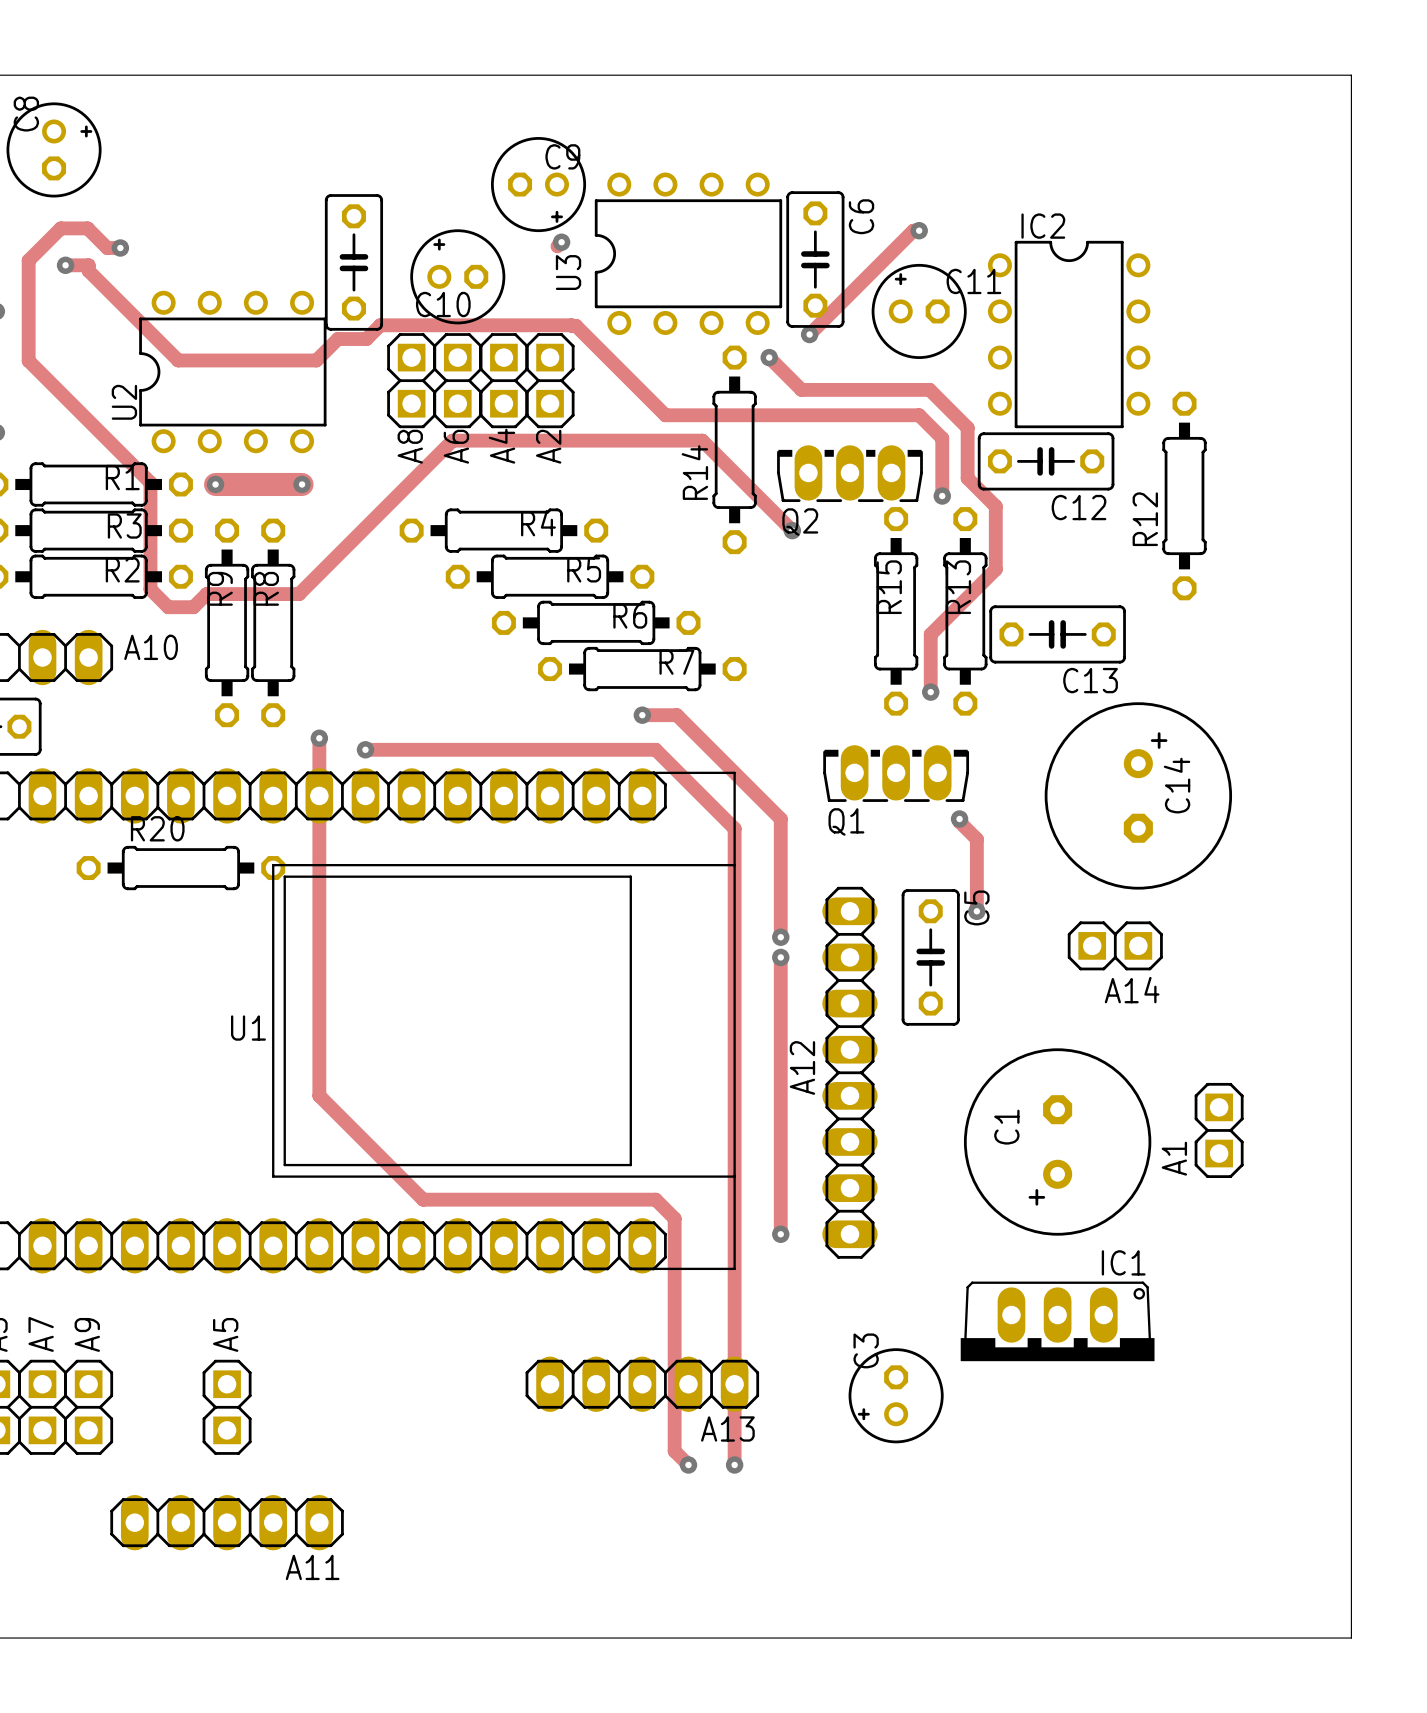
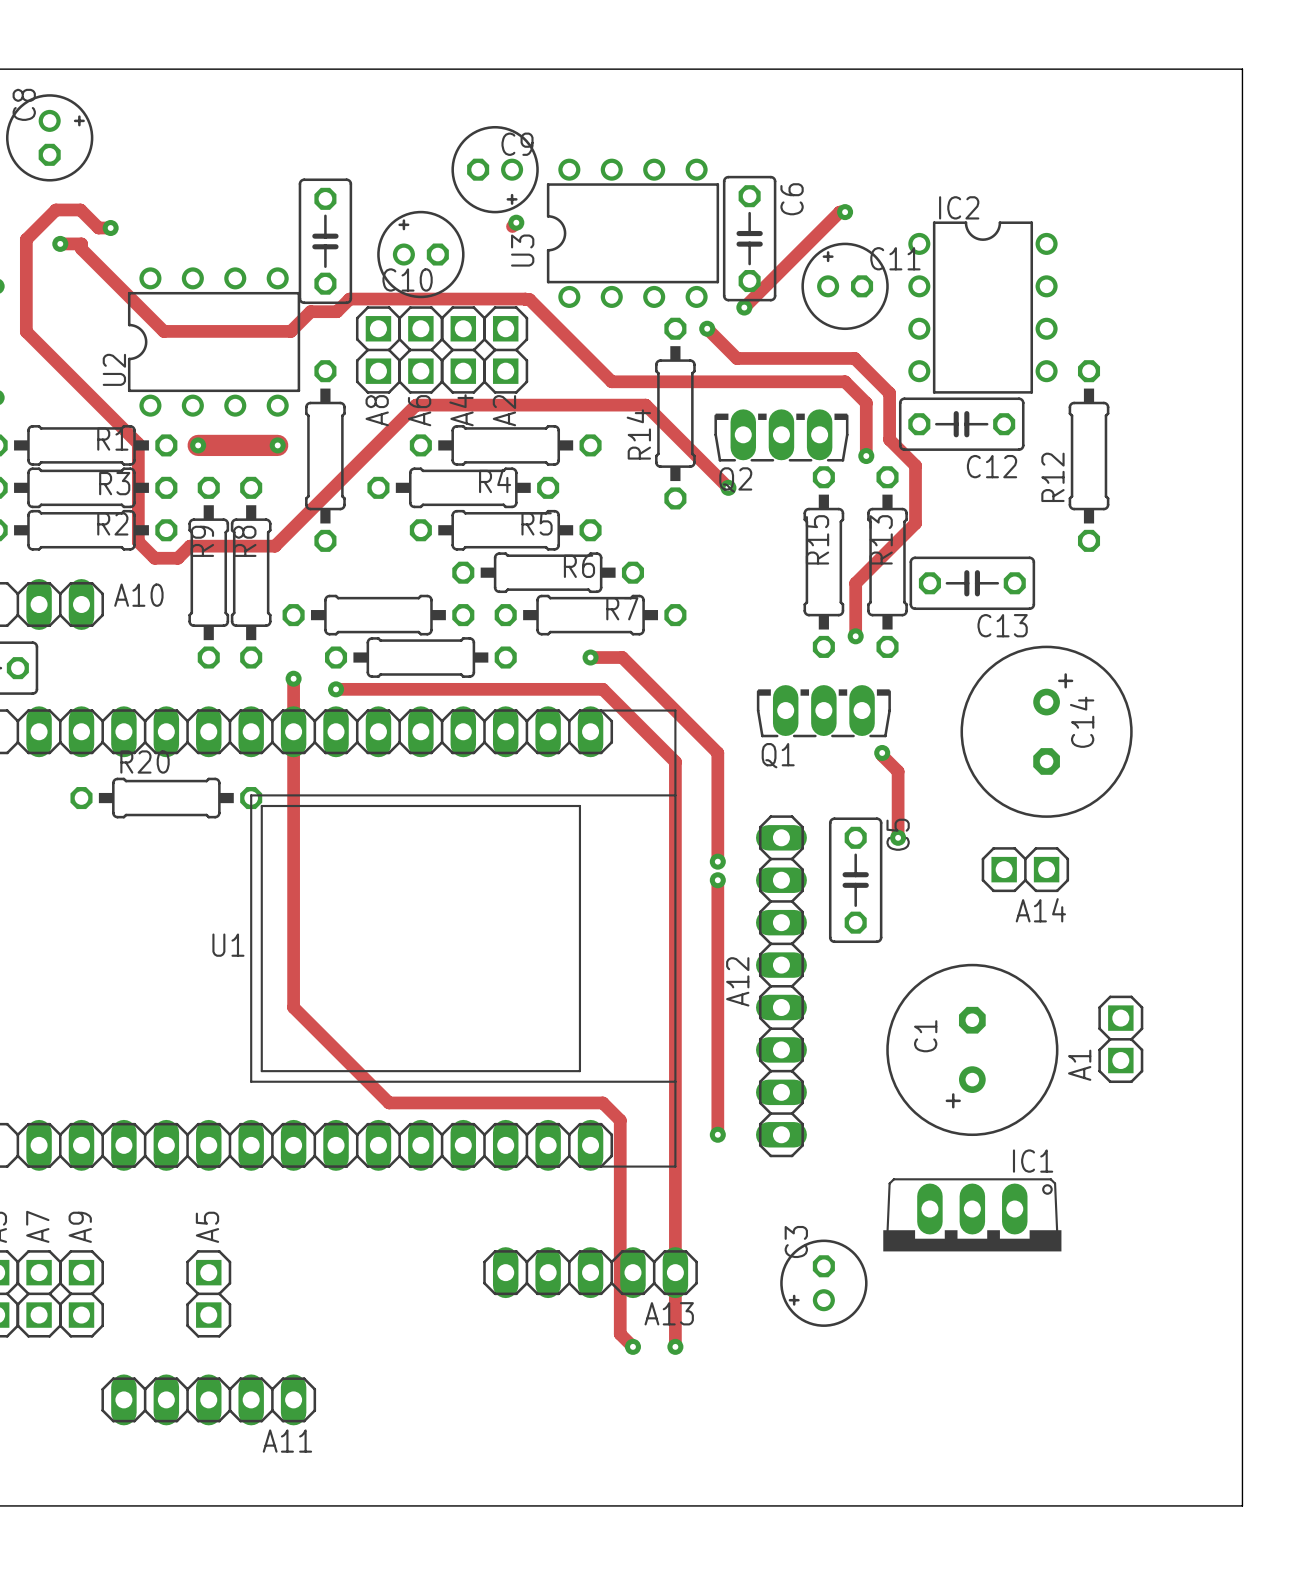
part: none -> (505, 445)
part: none -> (325, 456)
part: none -> (378, 615)
part: none -> (420, 657)

